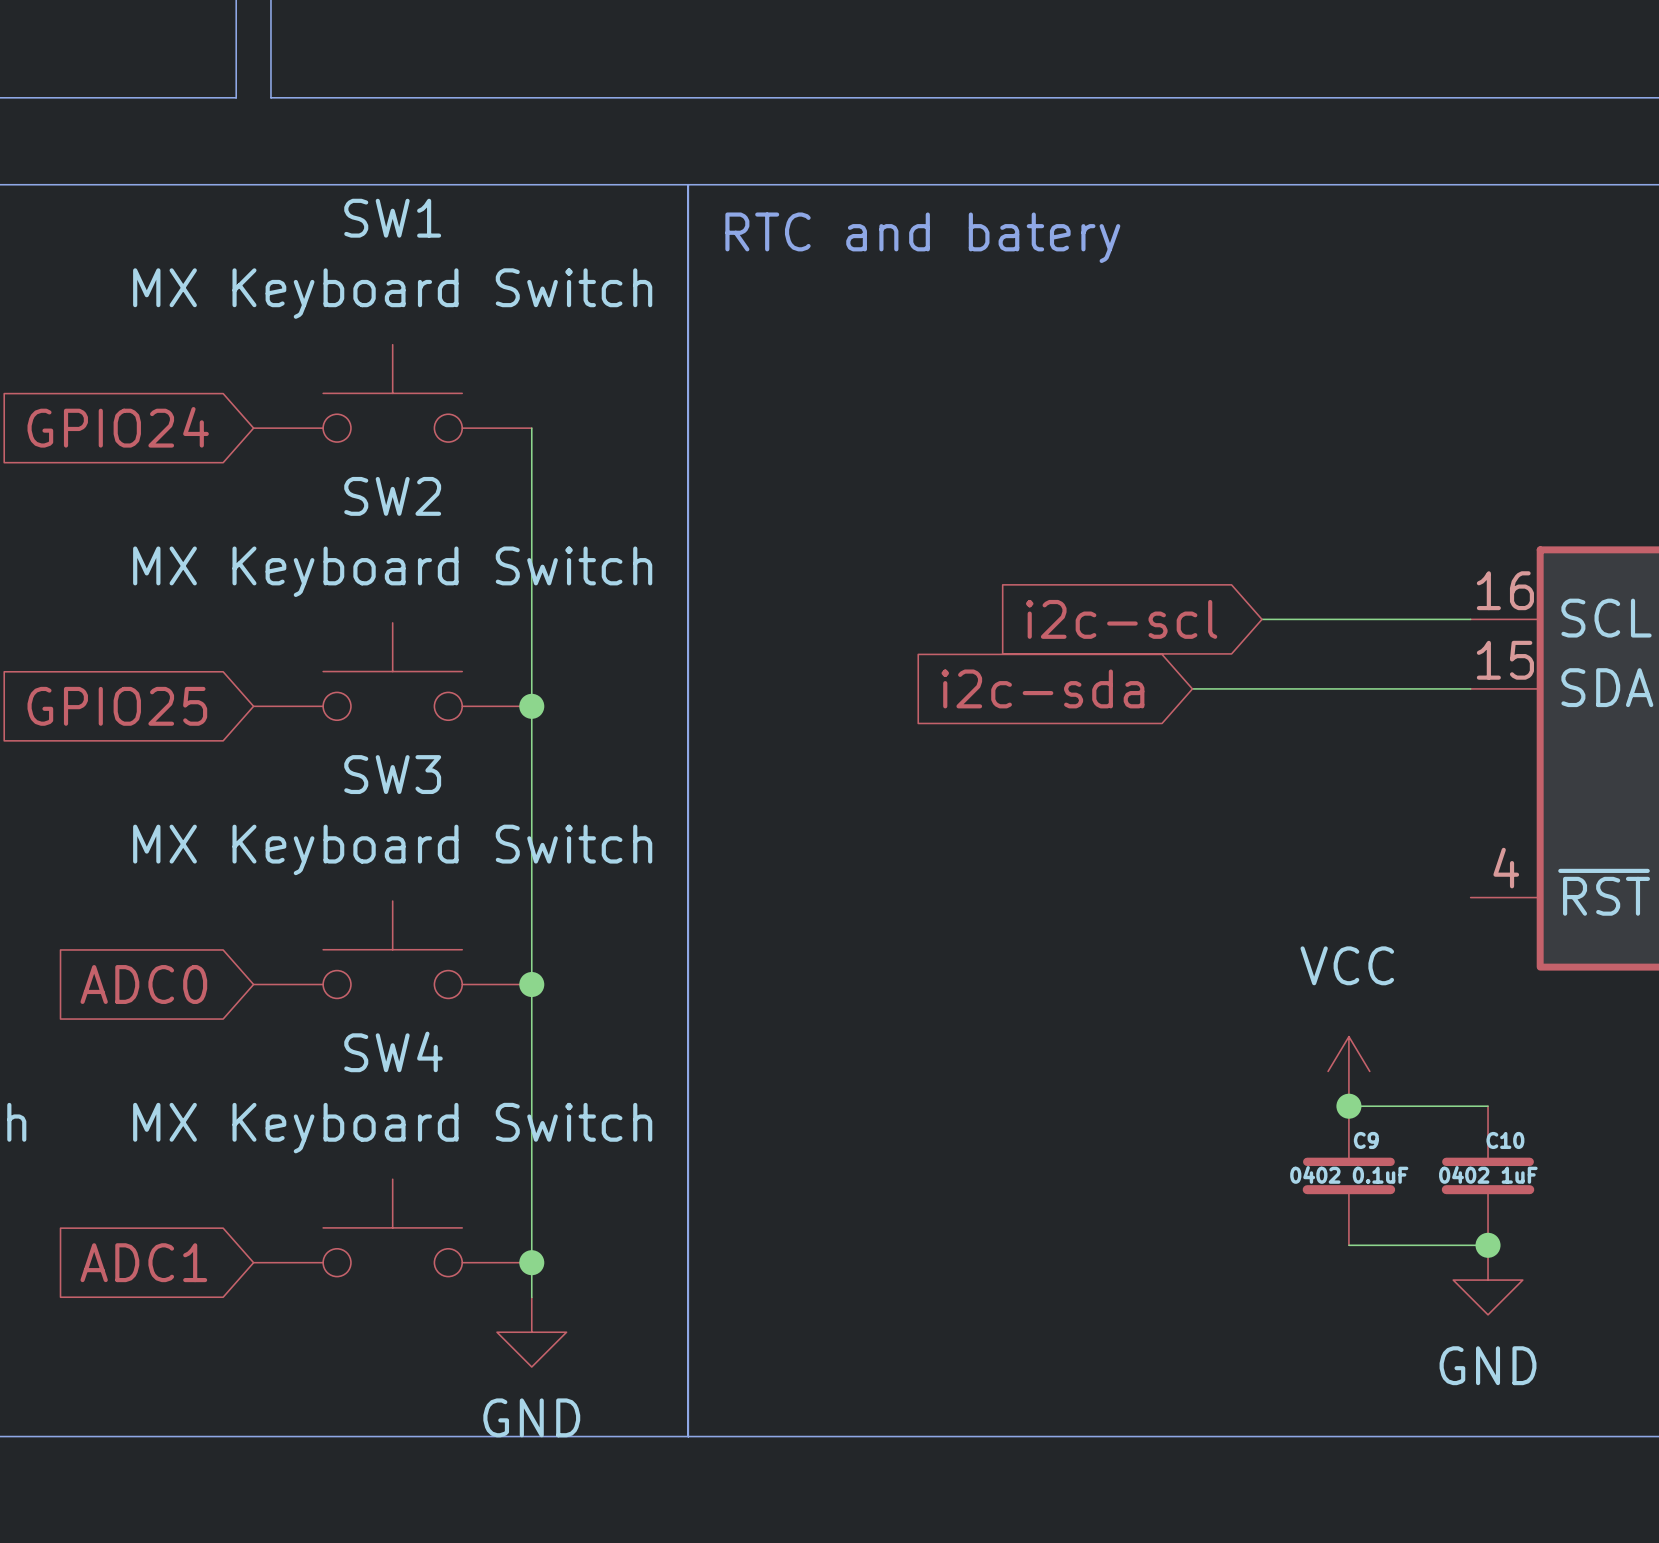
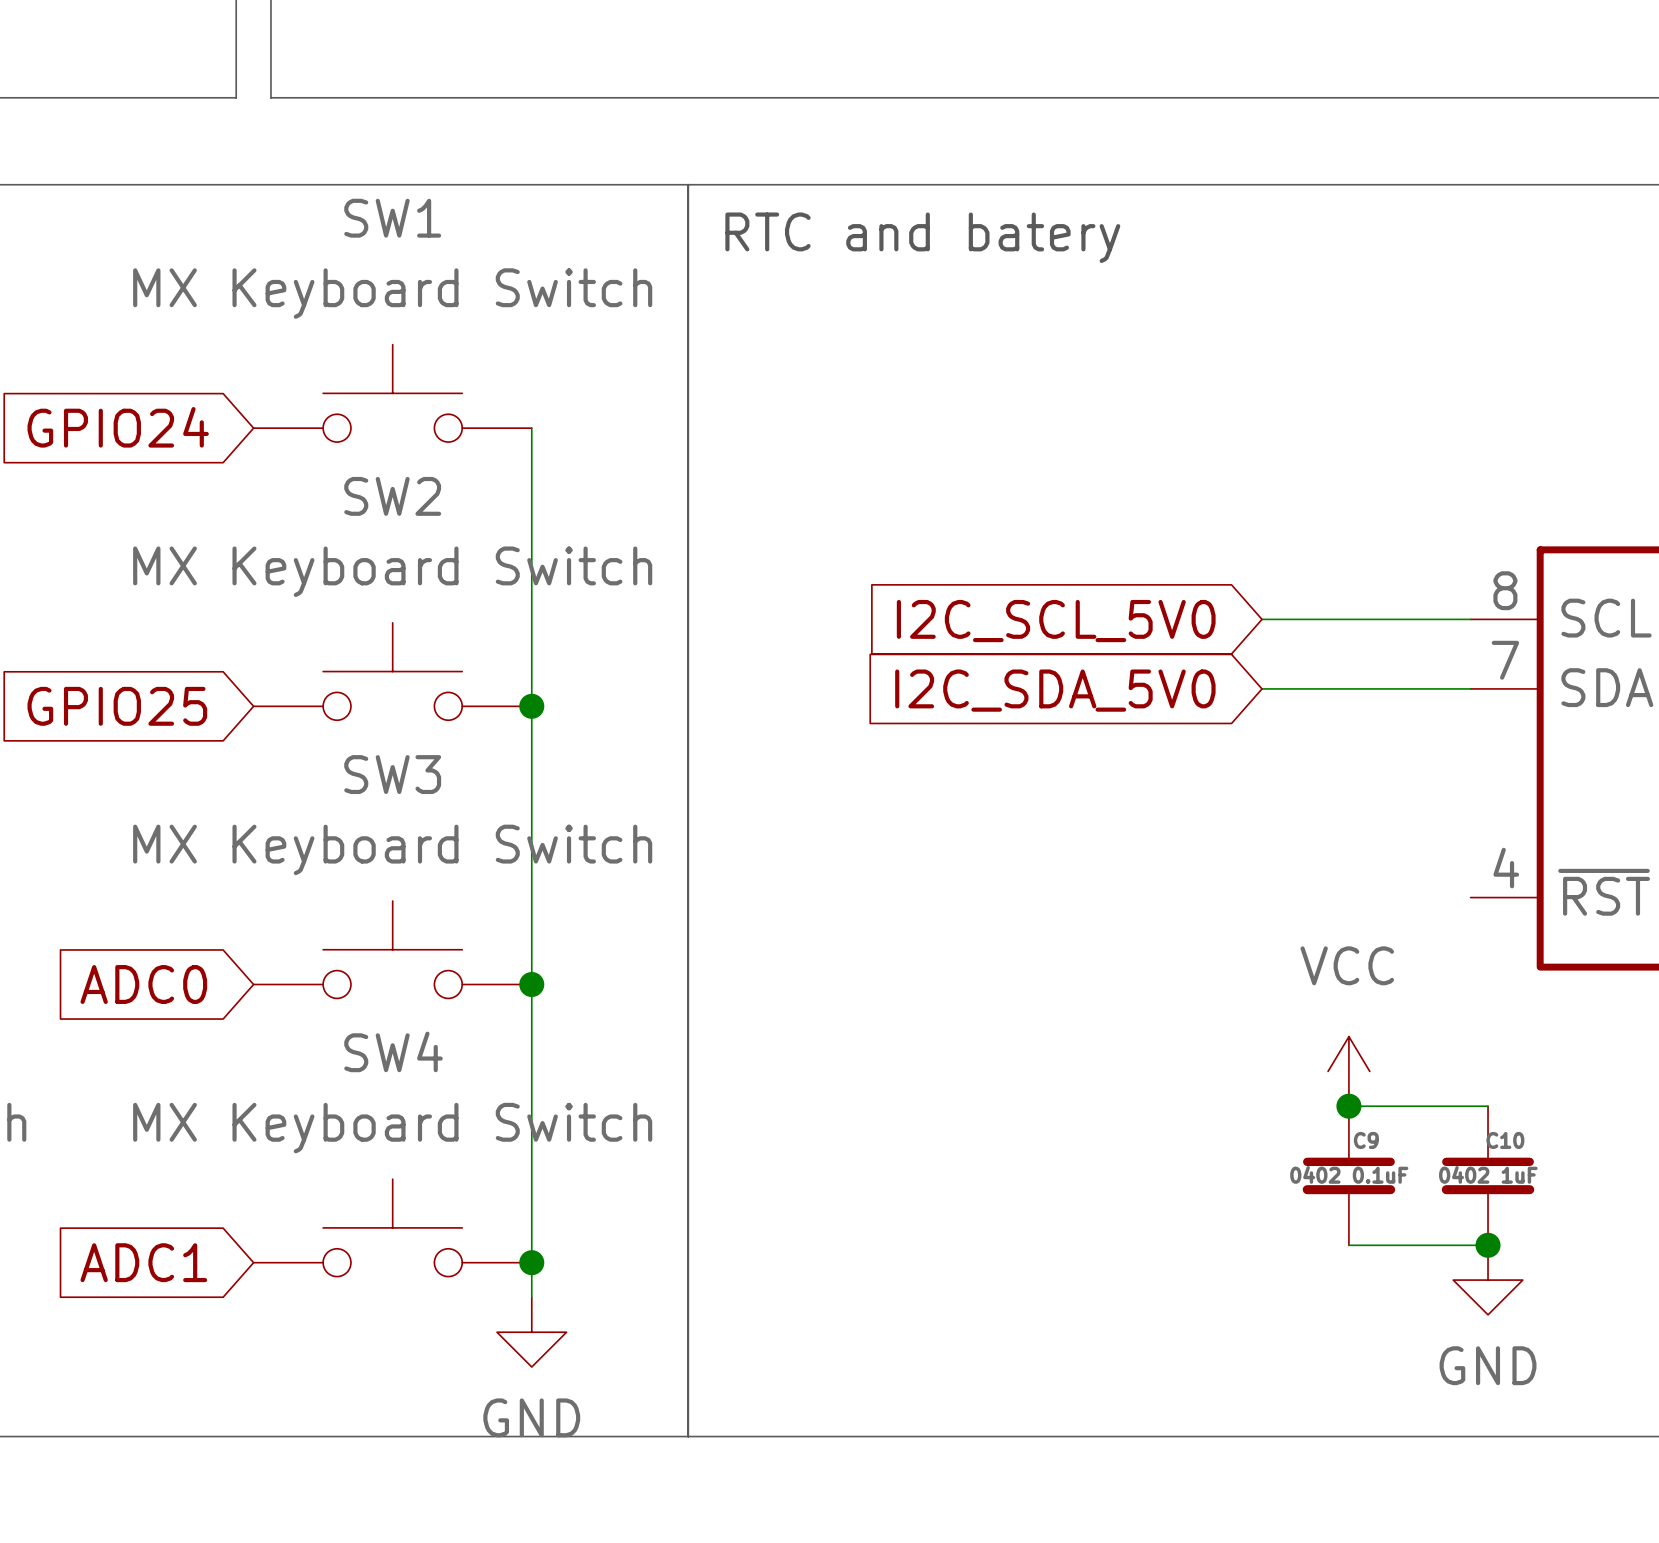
part pin number: 16 (1505, 590) -> 8 (1505, 590)
global label: i2c-scl (1121, 619) -> I2C_SCL_5V0 (1056, 621)
part pin number: 15 (1505, 660) -> 7 (1505, 660)
global label: i2c-sda (1042, 688) -> none
wire: (1192, 688) (1262, 688) -> none
global label: none -> I2C_SDA_5V0 (1055, 690)

